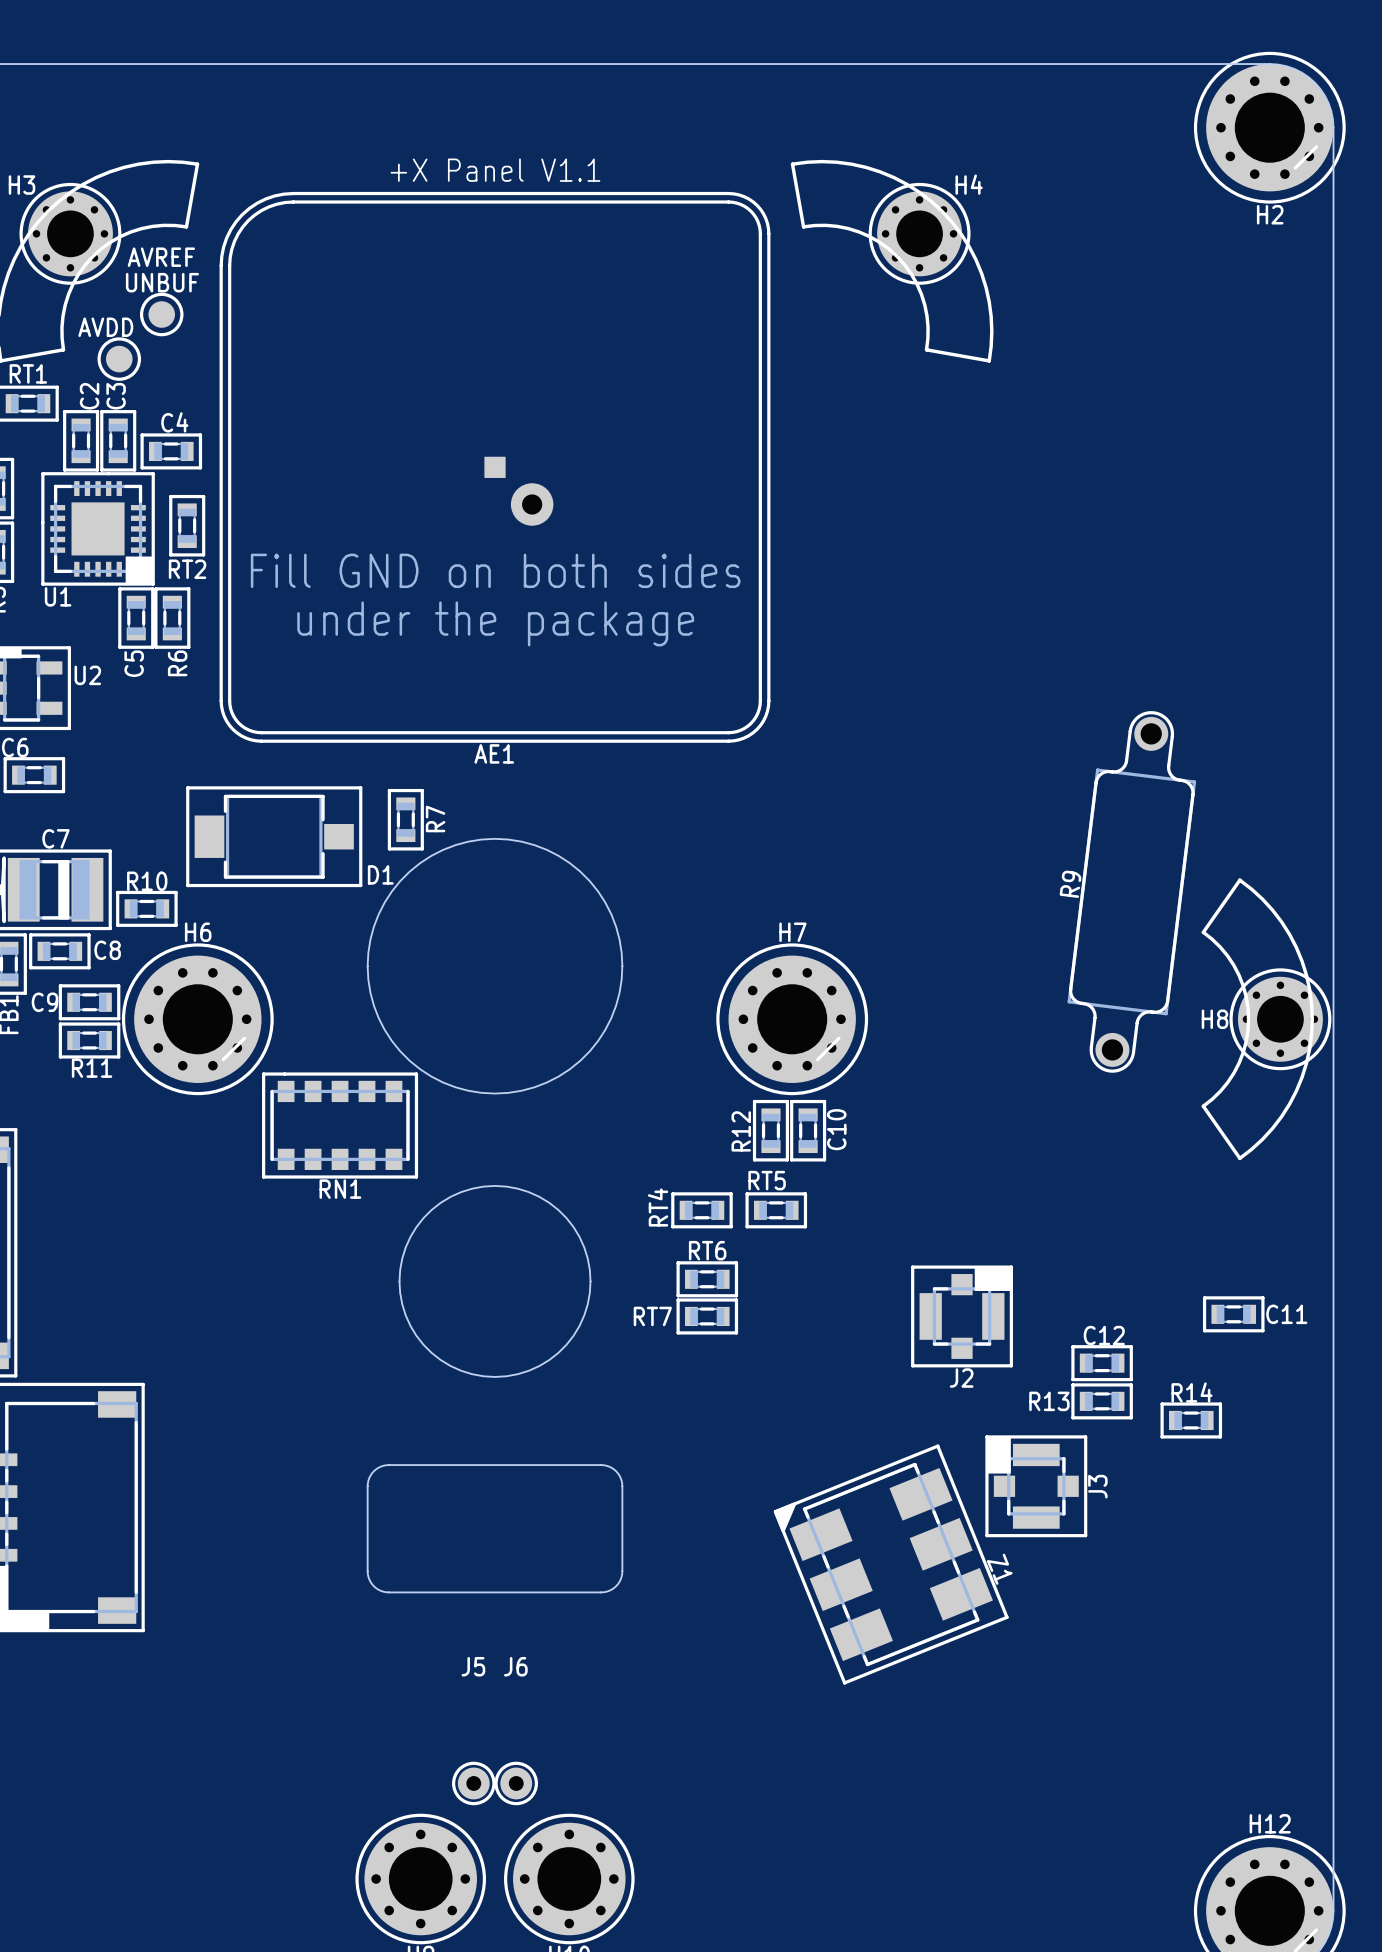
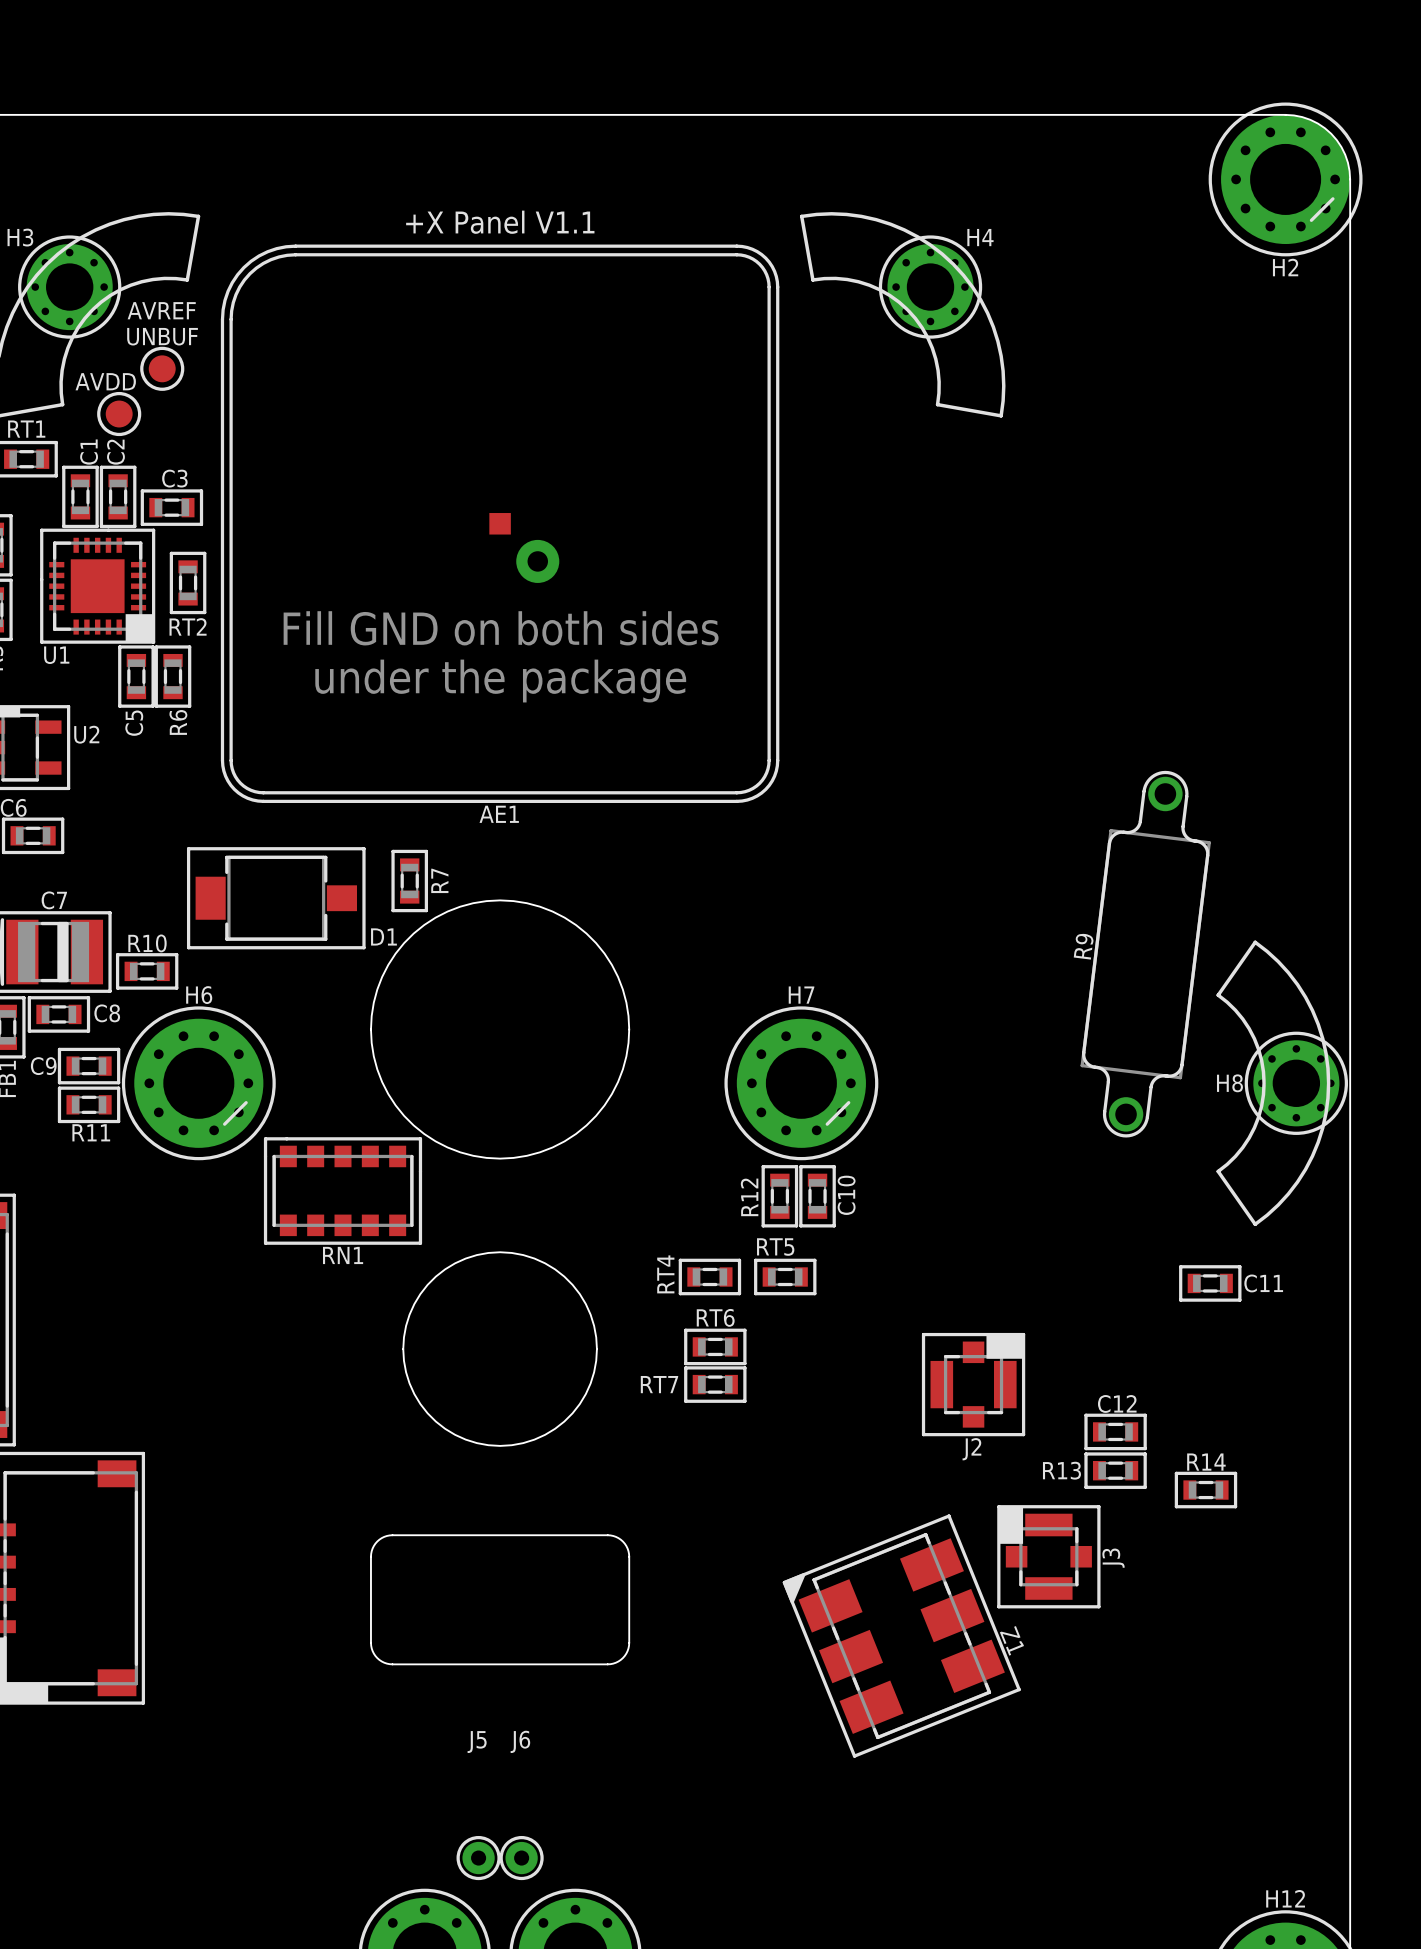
C2 name: C2 (89, 396) -> C1 (89, 452)
C3 name: C3 (116, 396) -> C2 (115, 452)
C4 name: C4 (174, 422) -> C3 (174, 478)
C11 position: (1233, 1314) -> (1210, 1283)

